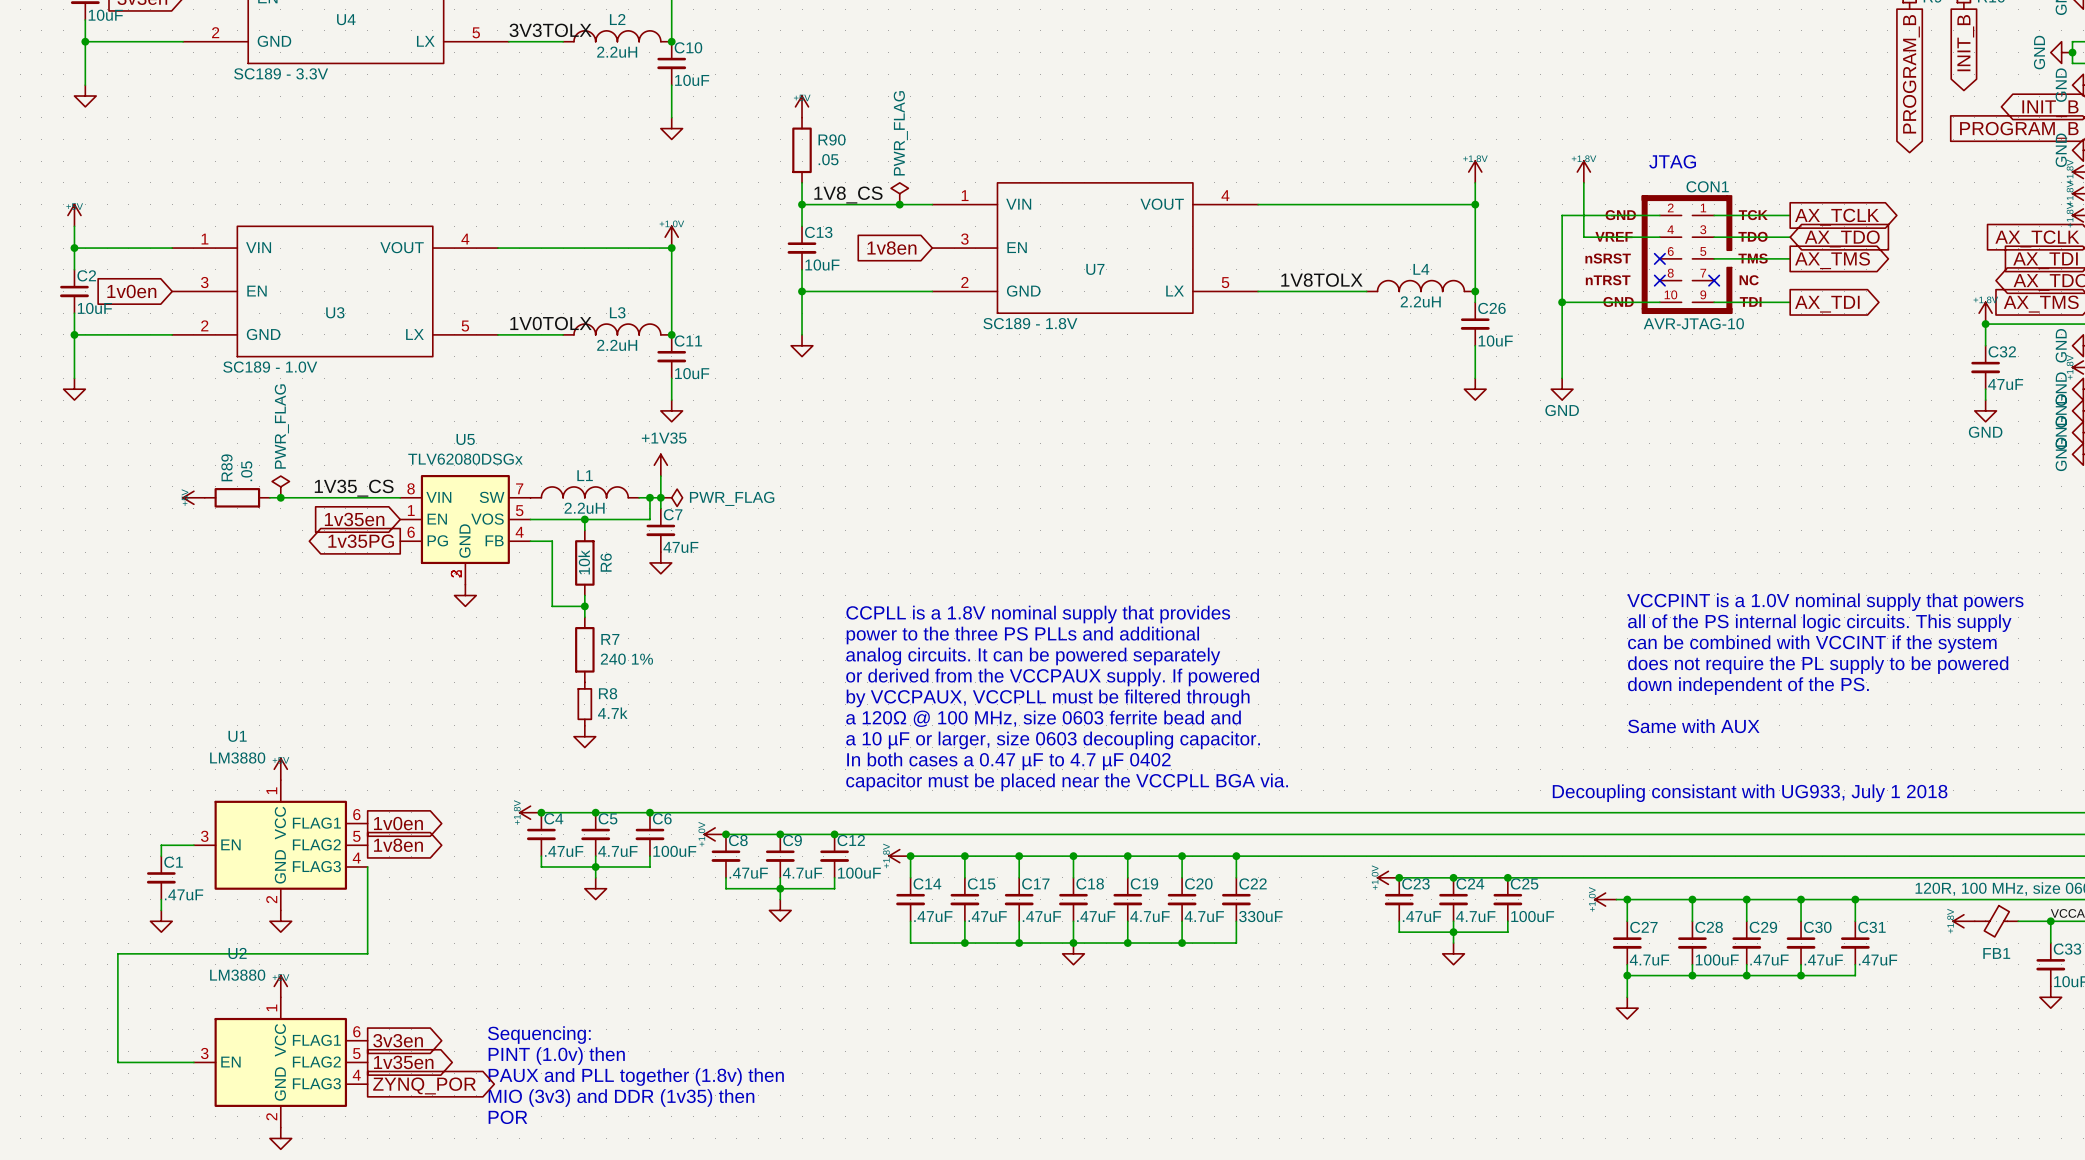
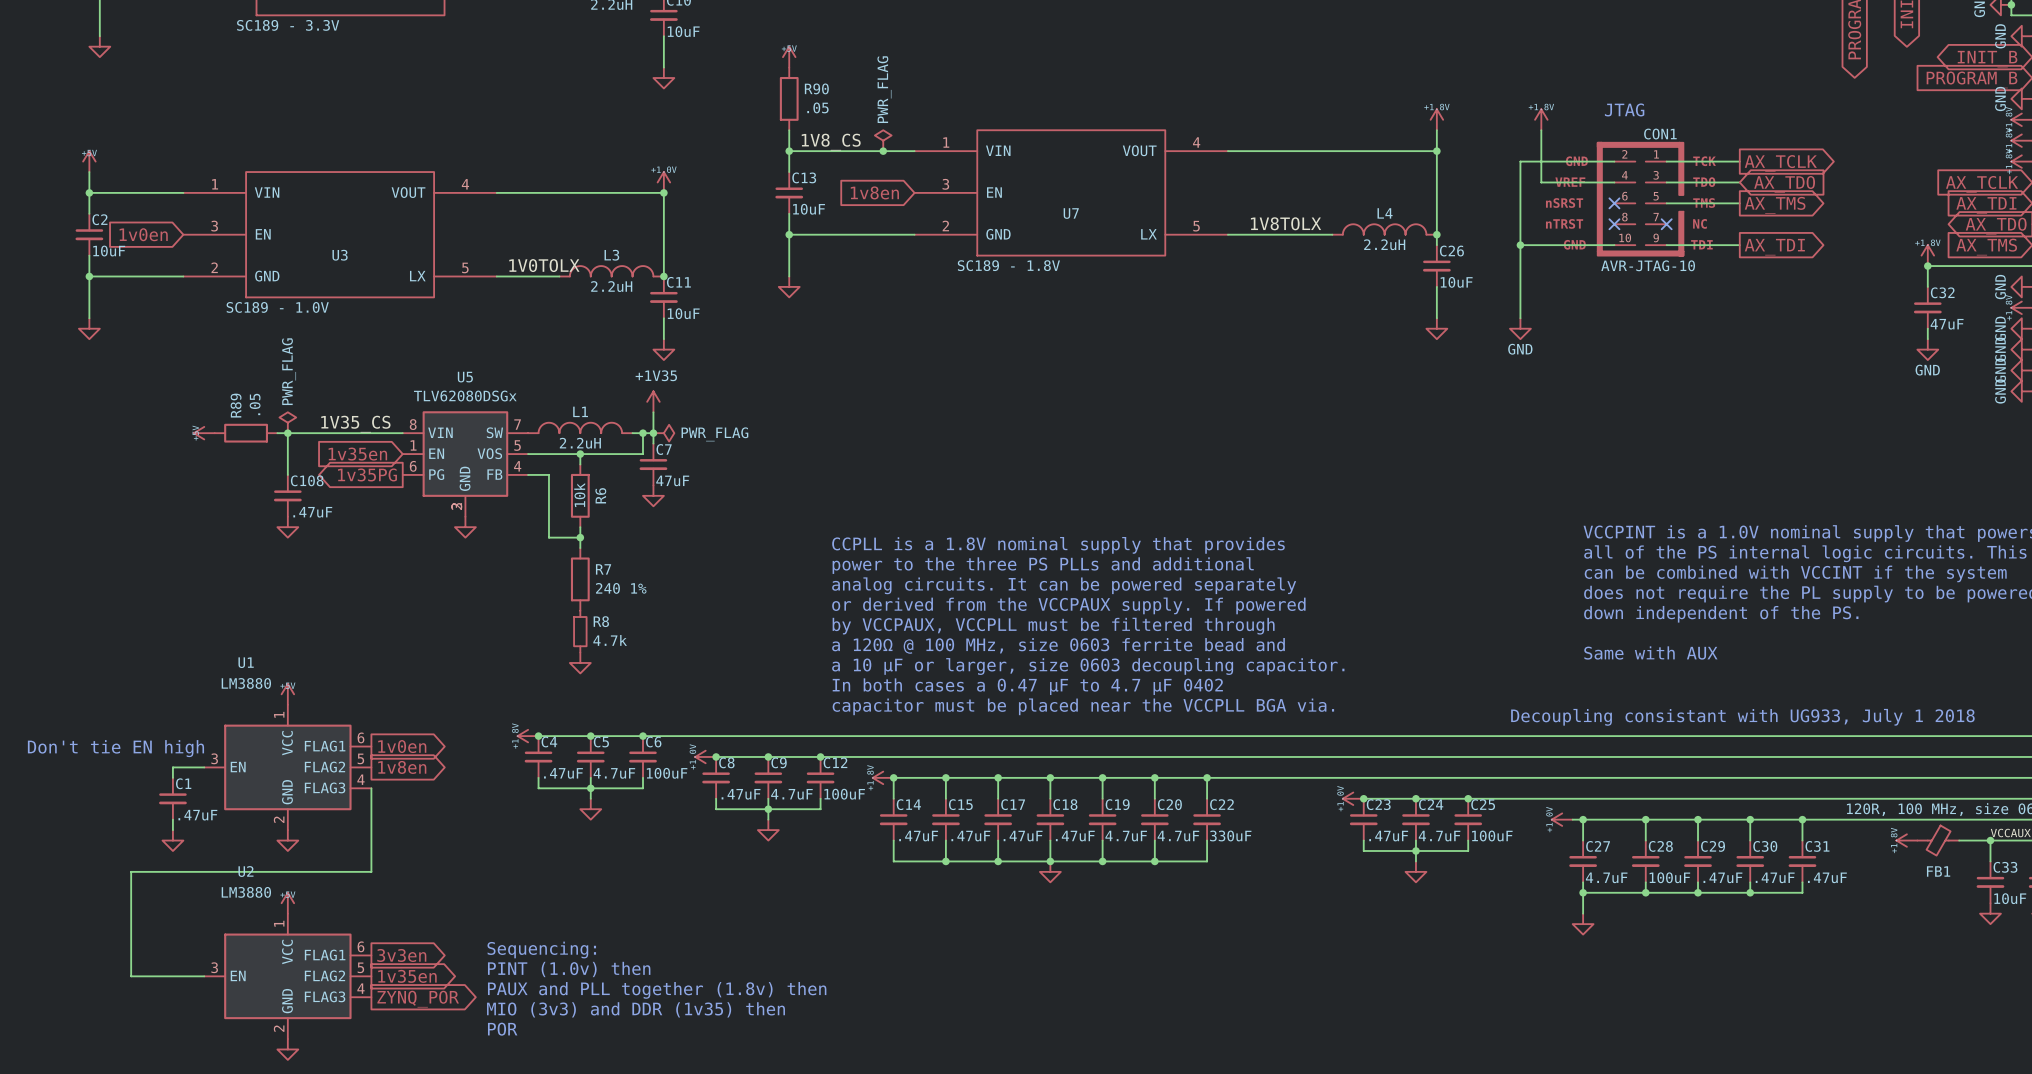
wire: none -> (287, 433) (287, 474)
C108: none -> .47uF (287, 495)
power symbol: none -> (287, 527)
text: none -> Don't tie EN high (115, 748)

